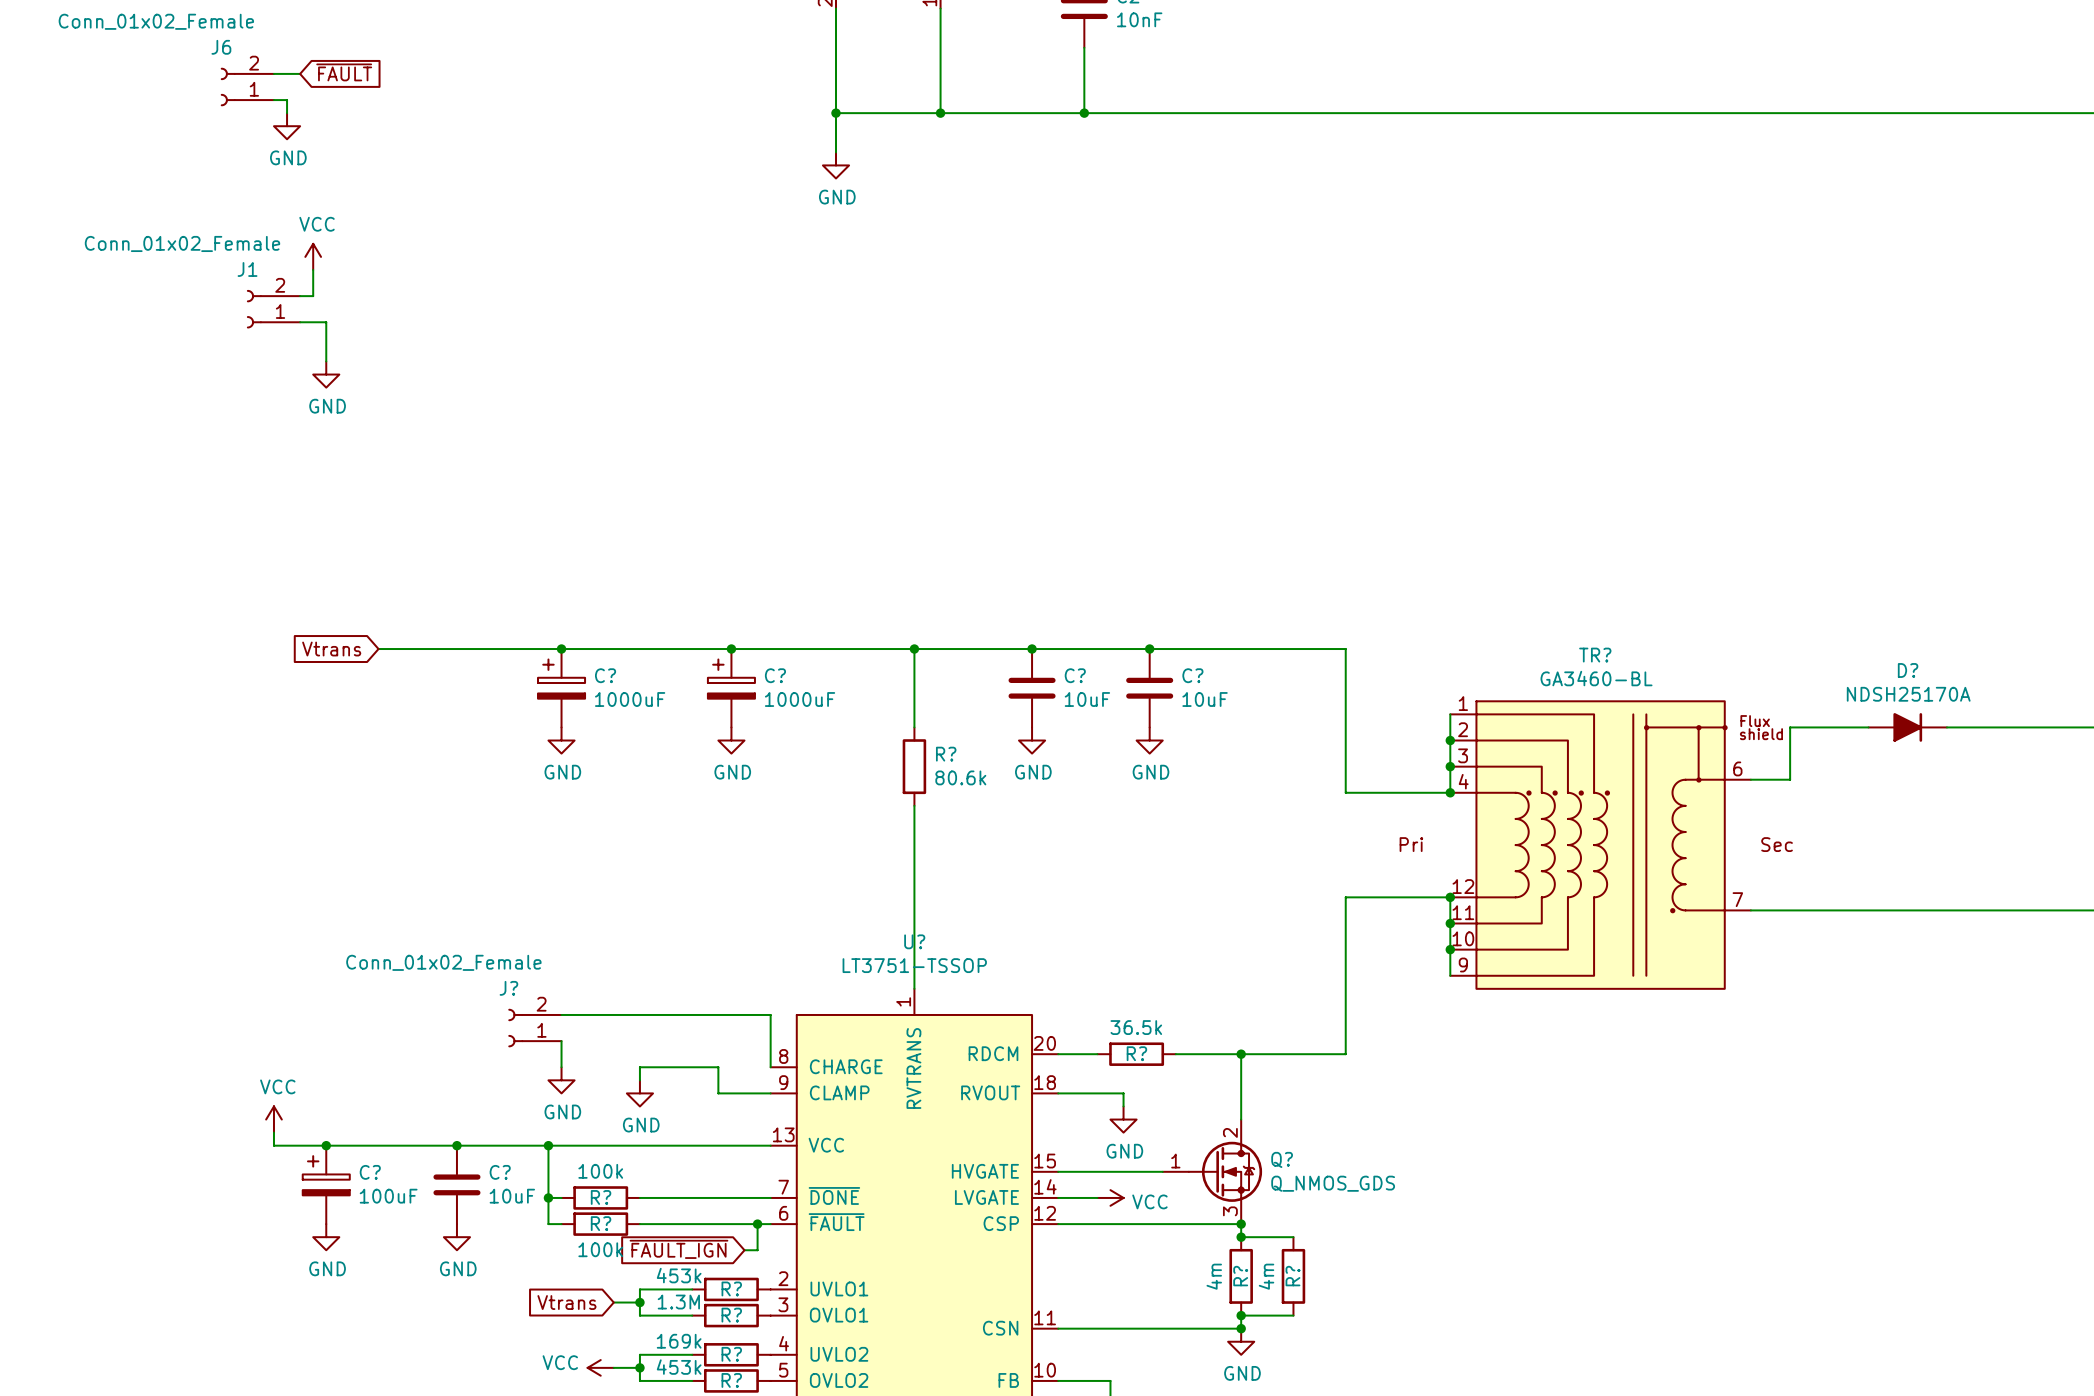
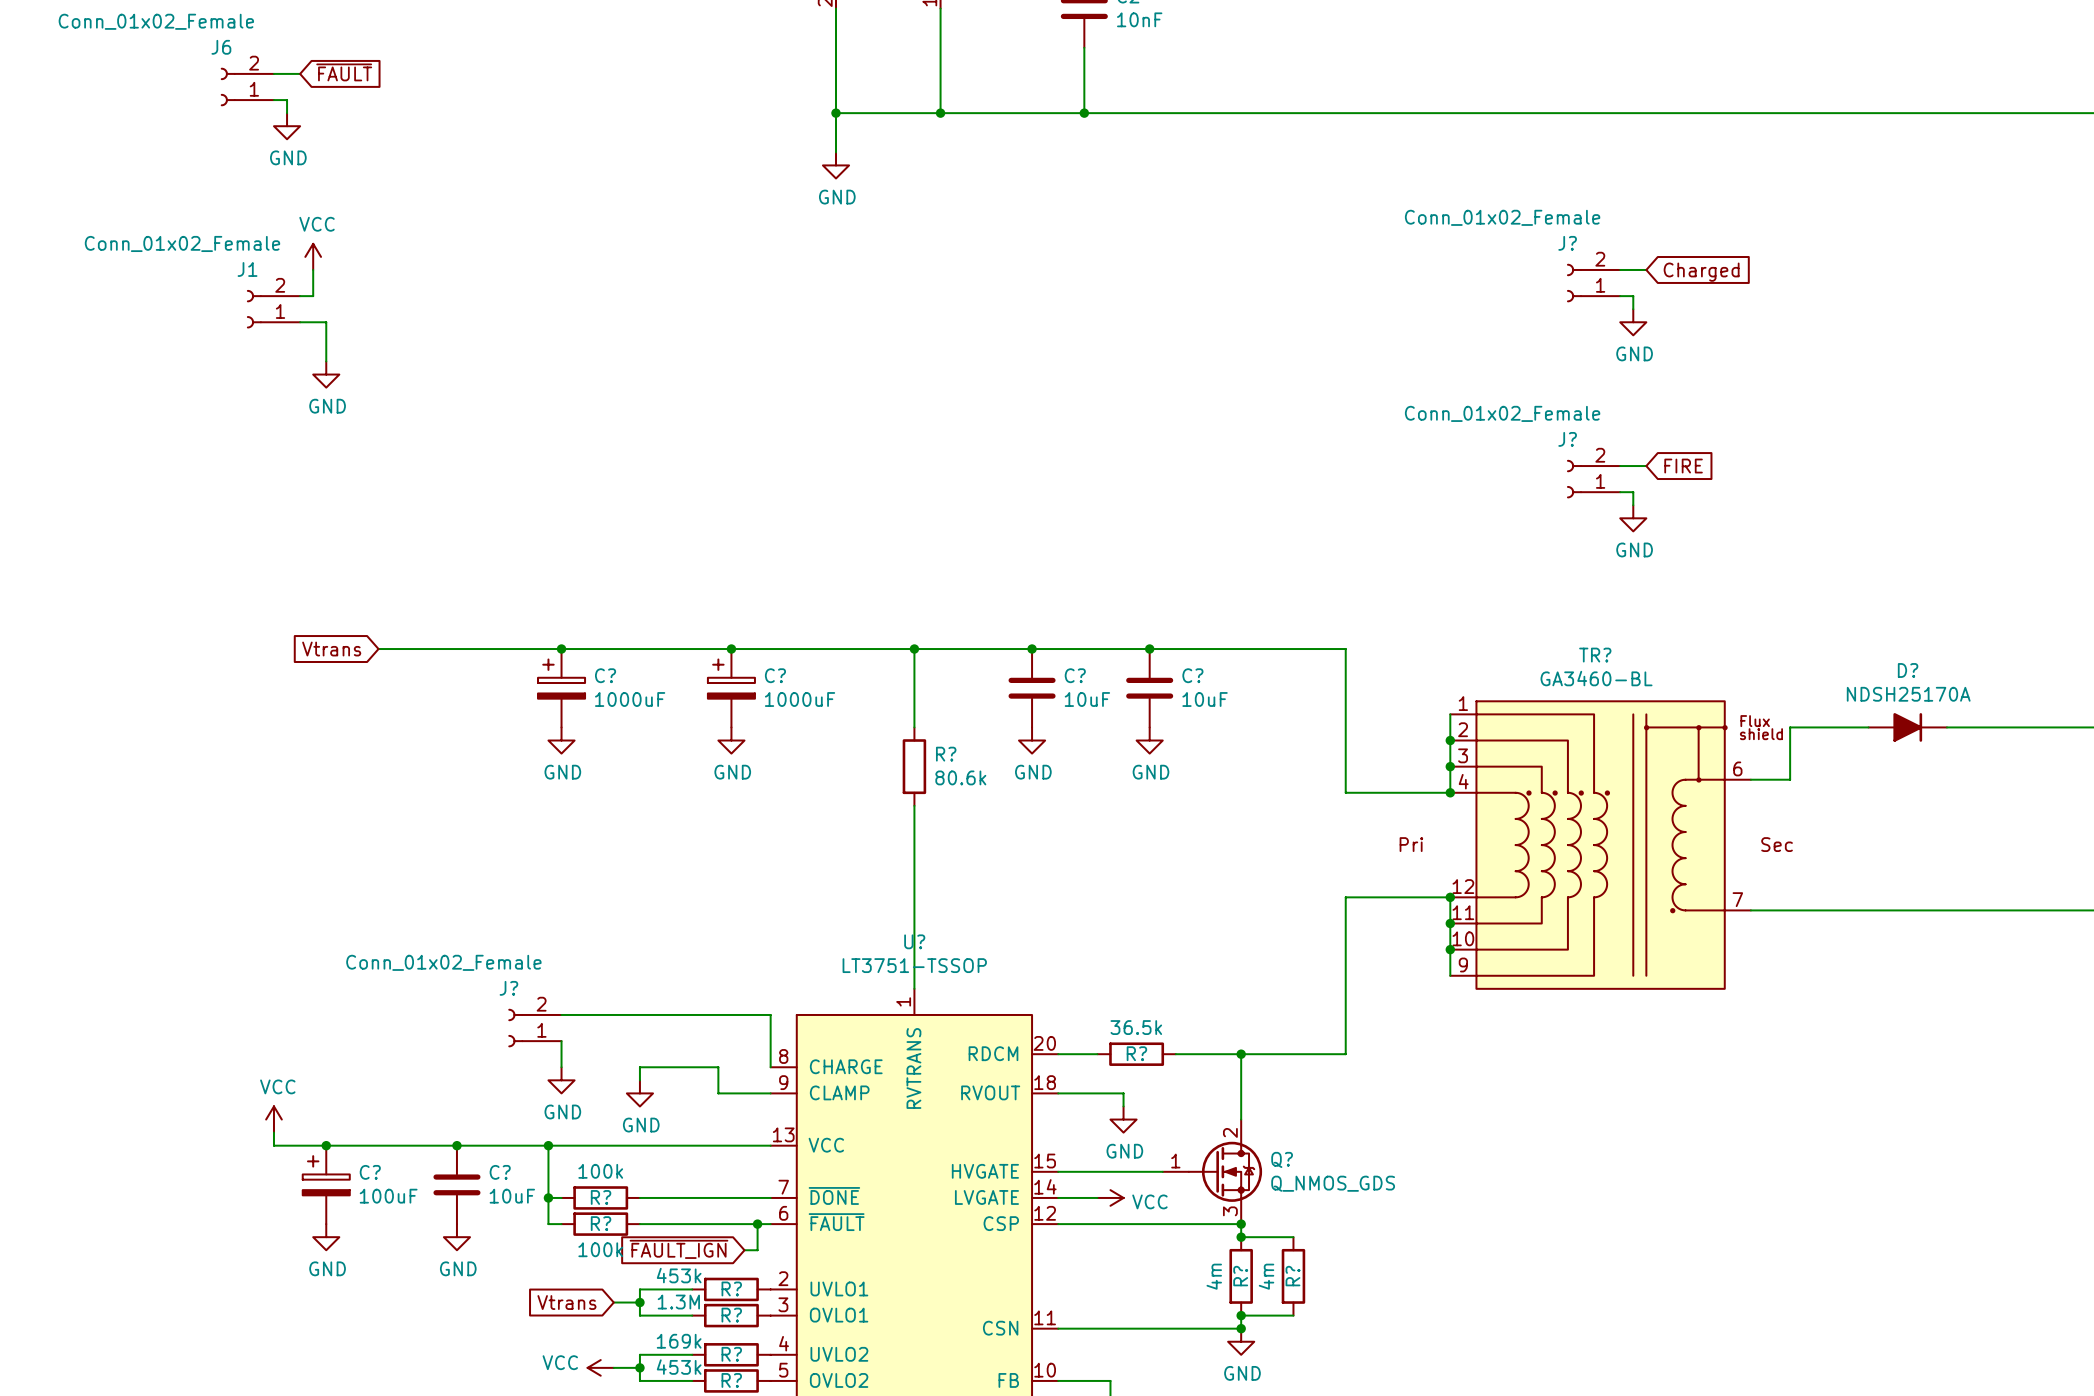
wire: none -> (1620, 269) (1646, 269)
global label: none -> Charged (1701, 272)
J?: none -> Conn_01x02_Female (1593, 283)
wire: none -> (1620, 296) (1633, 296) (1633, 309)
power symbol: none -> GND (1633, 322)
wire: none -> (1620, 466) (1646, 466)
global label: none -> FIRE (1683, 466)
J?: none -> Conn_01x02_Female (1593, 479)
wire: none -> (1620, 492) (1633, 492) (1633, 505)
power symbol: none -> GND (1633, 518)

